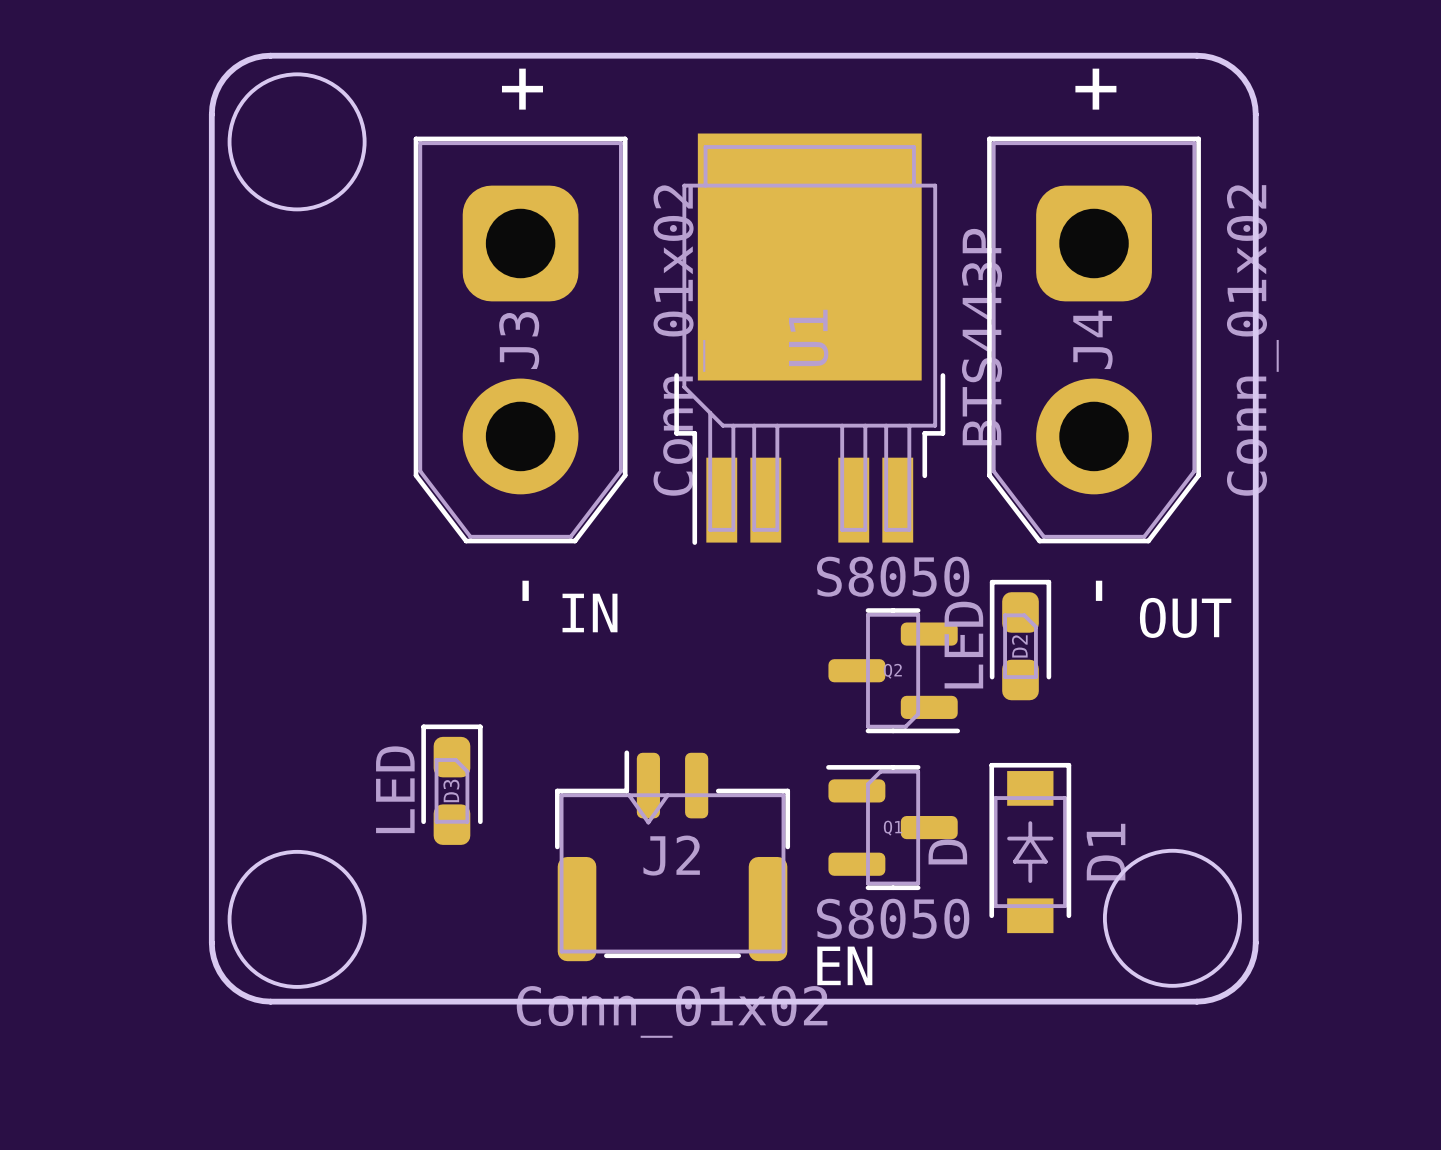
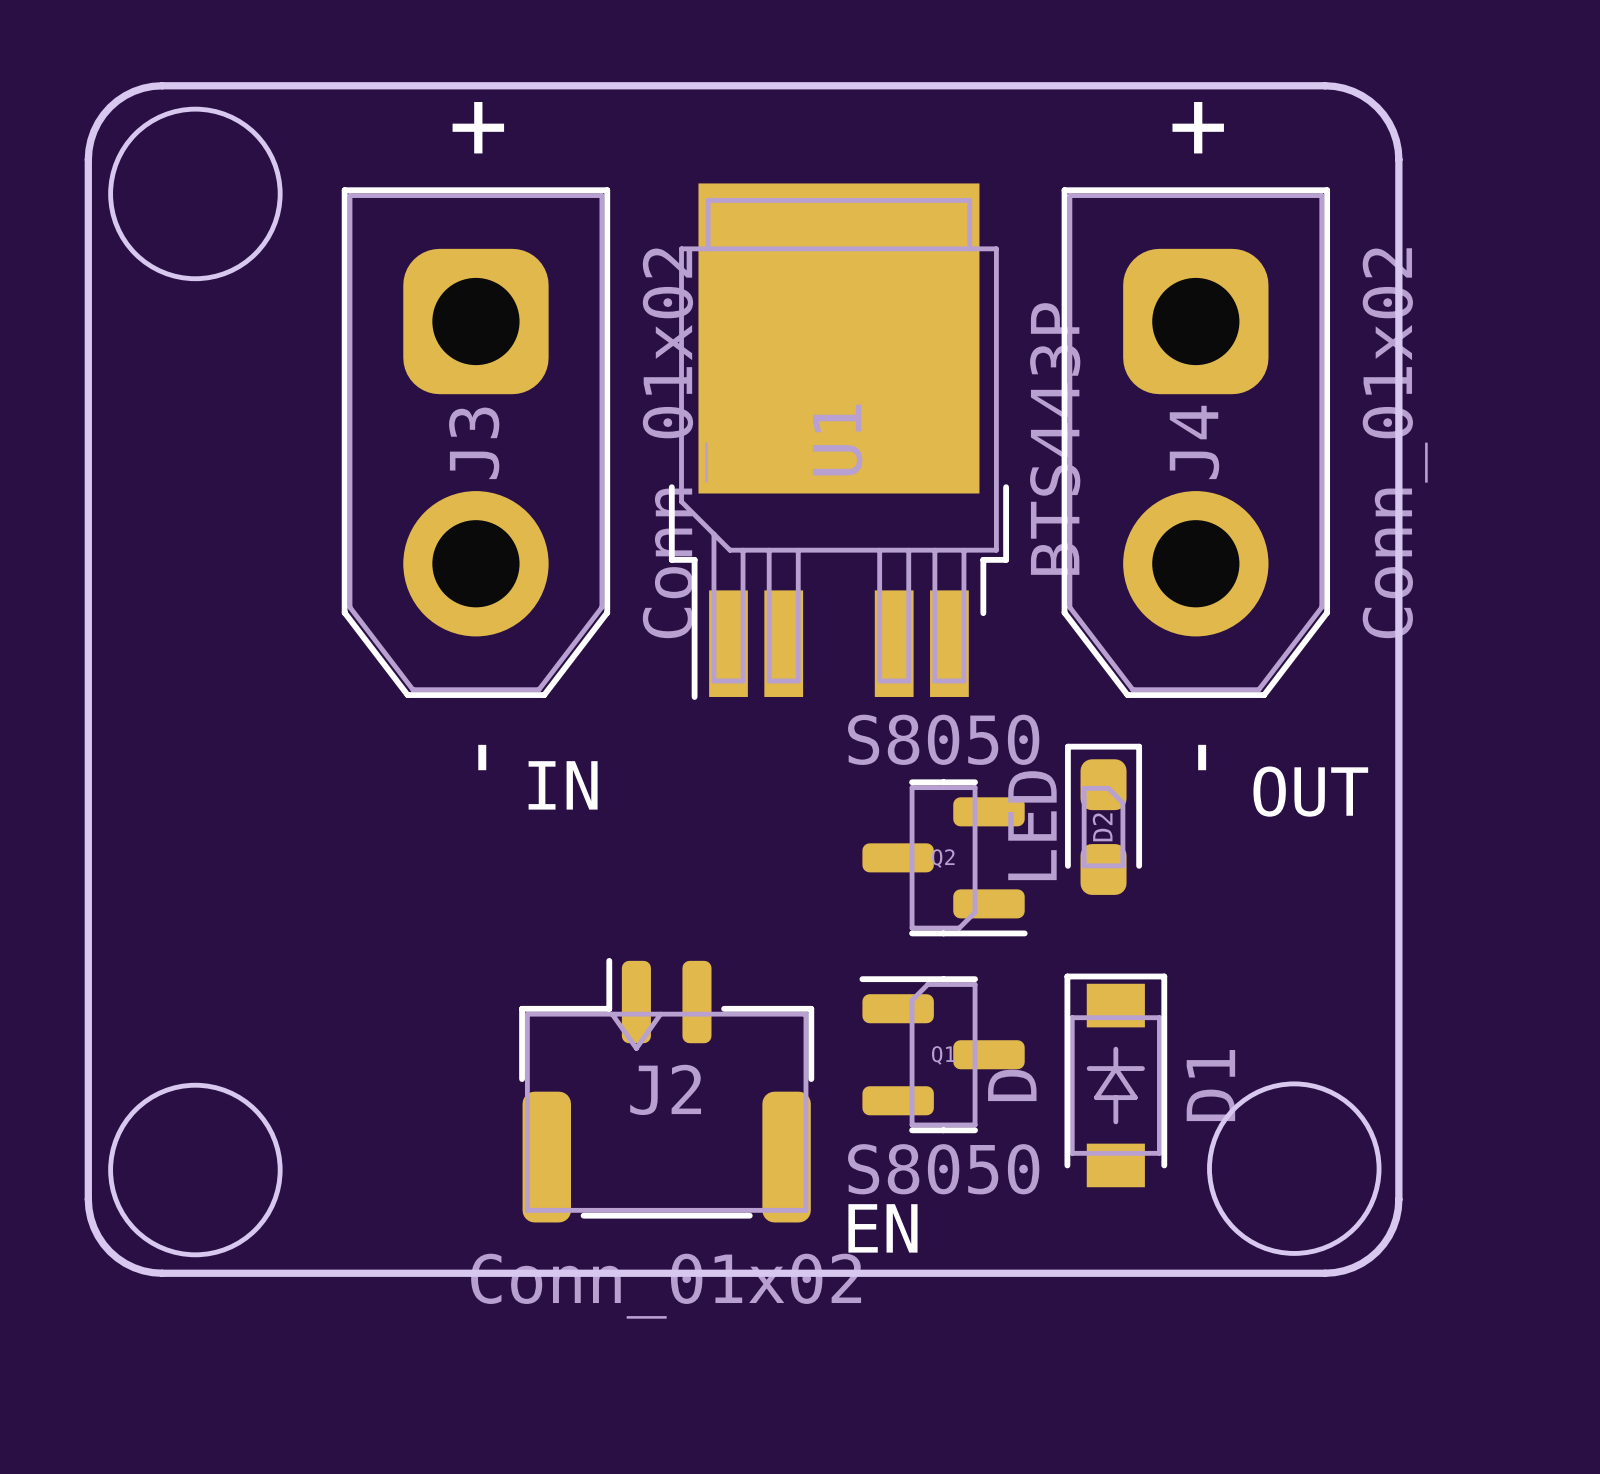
D3: LED (451, 784) -> none

